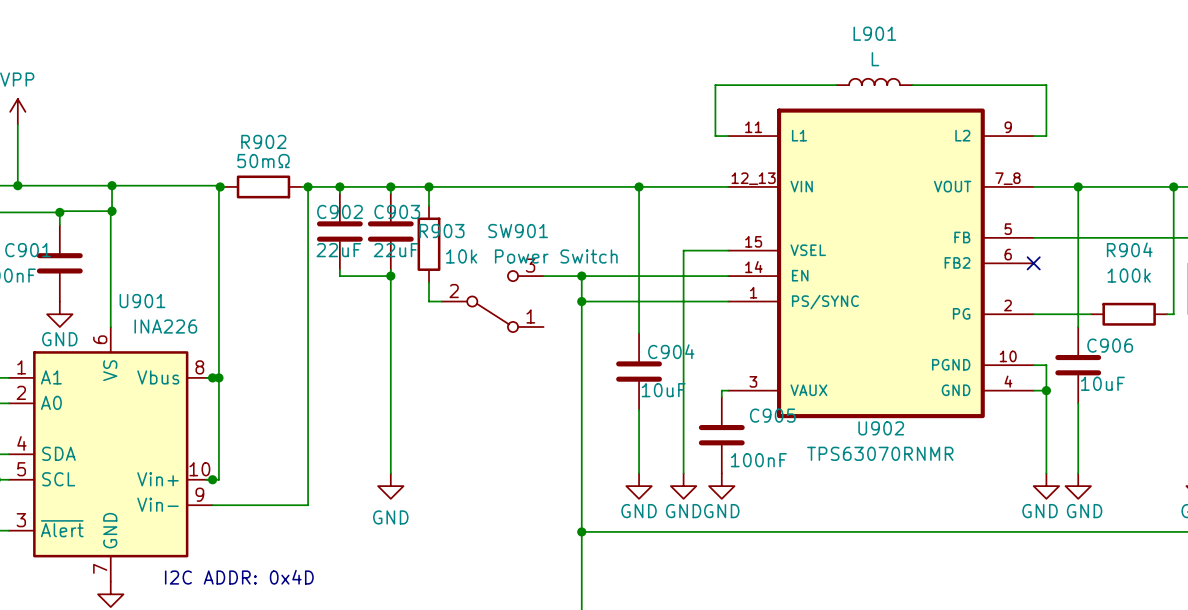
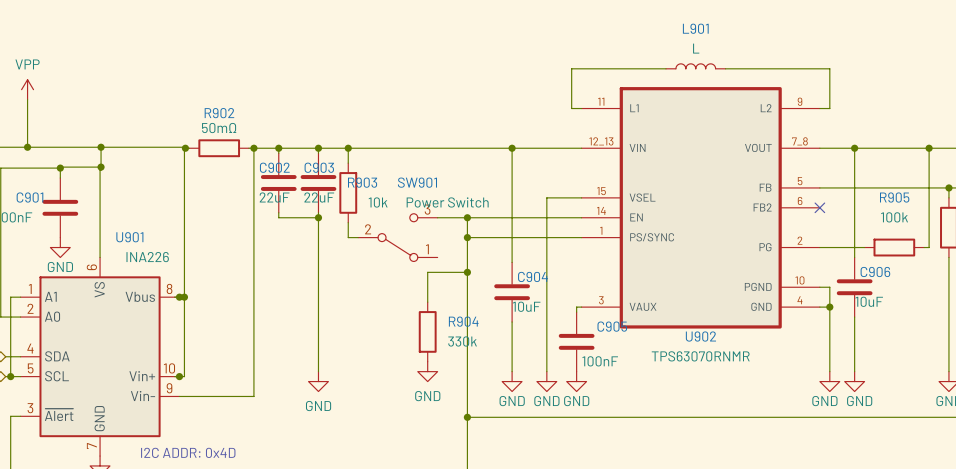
R904 name: R904 (1129, 249) -> R905 (894, 197)
wire: none -> (467, 272) (427, 272) (427, 302)
junction: none -> (467, 272)
R904: none -> 330k (427, 331)
power symbol: none -> GND (427, 371)

